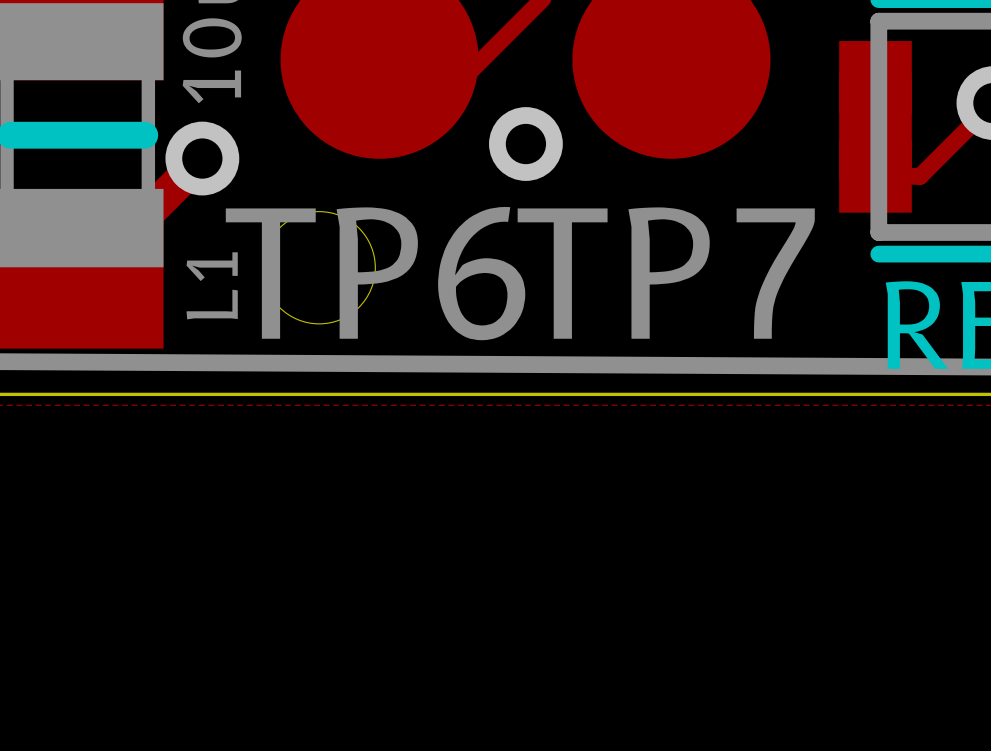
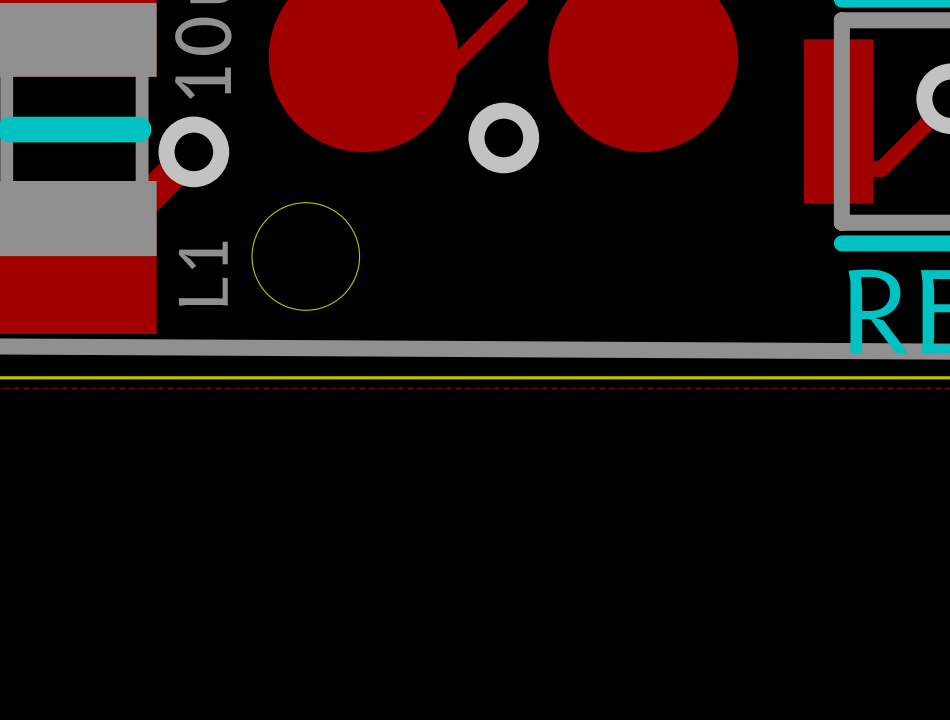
TP6 name: TP6 (375, 273) -> none
TP7 name: TP7 (666, 273) -> none

